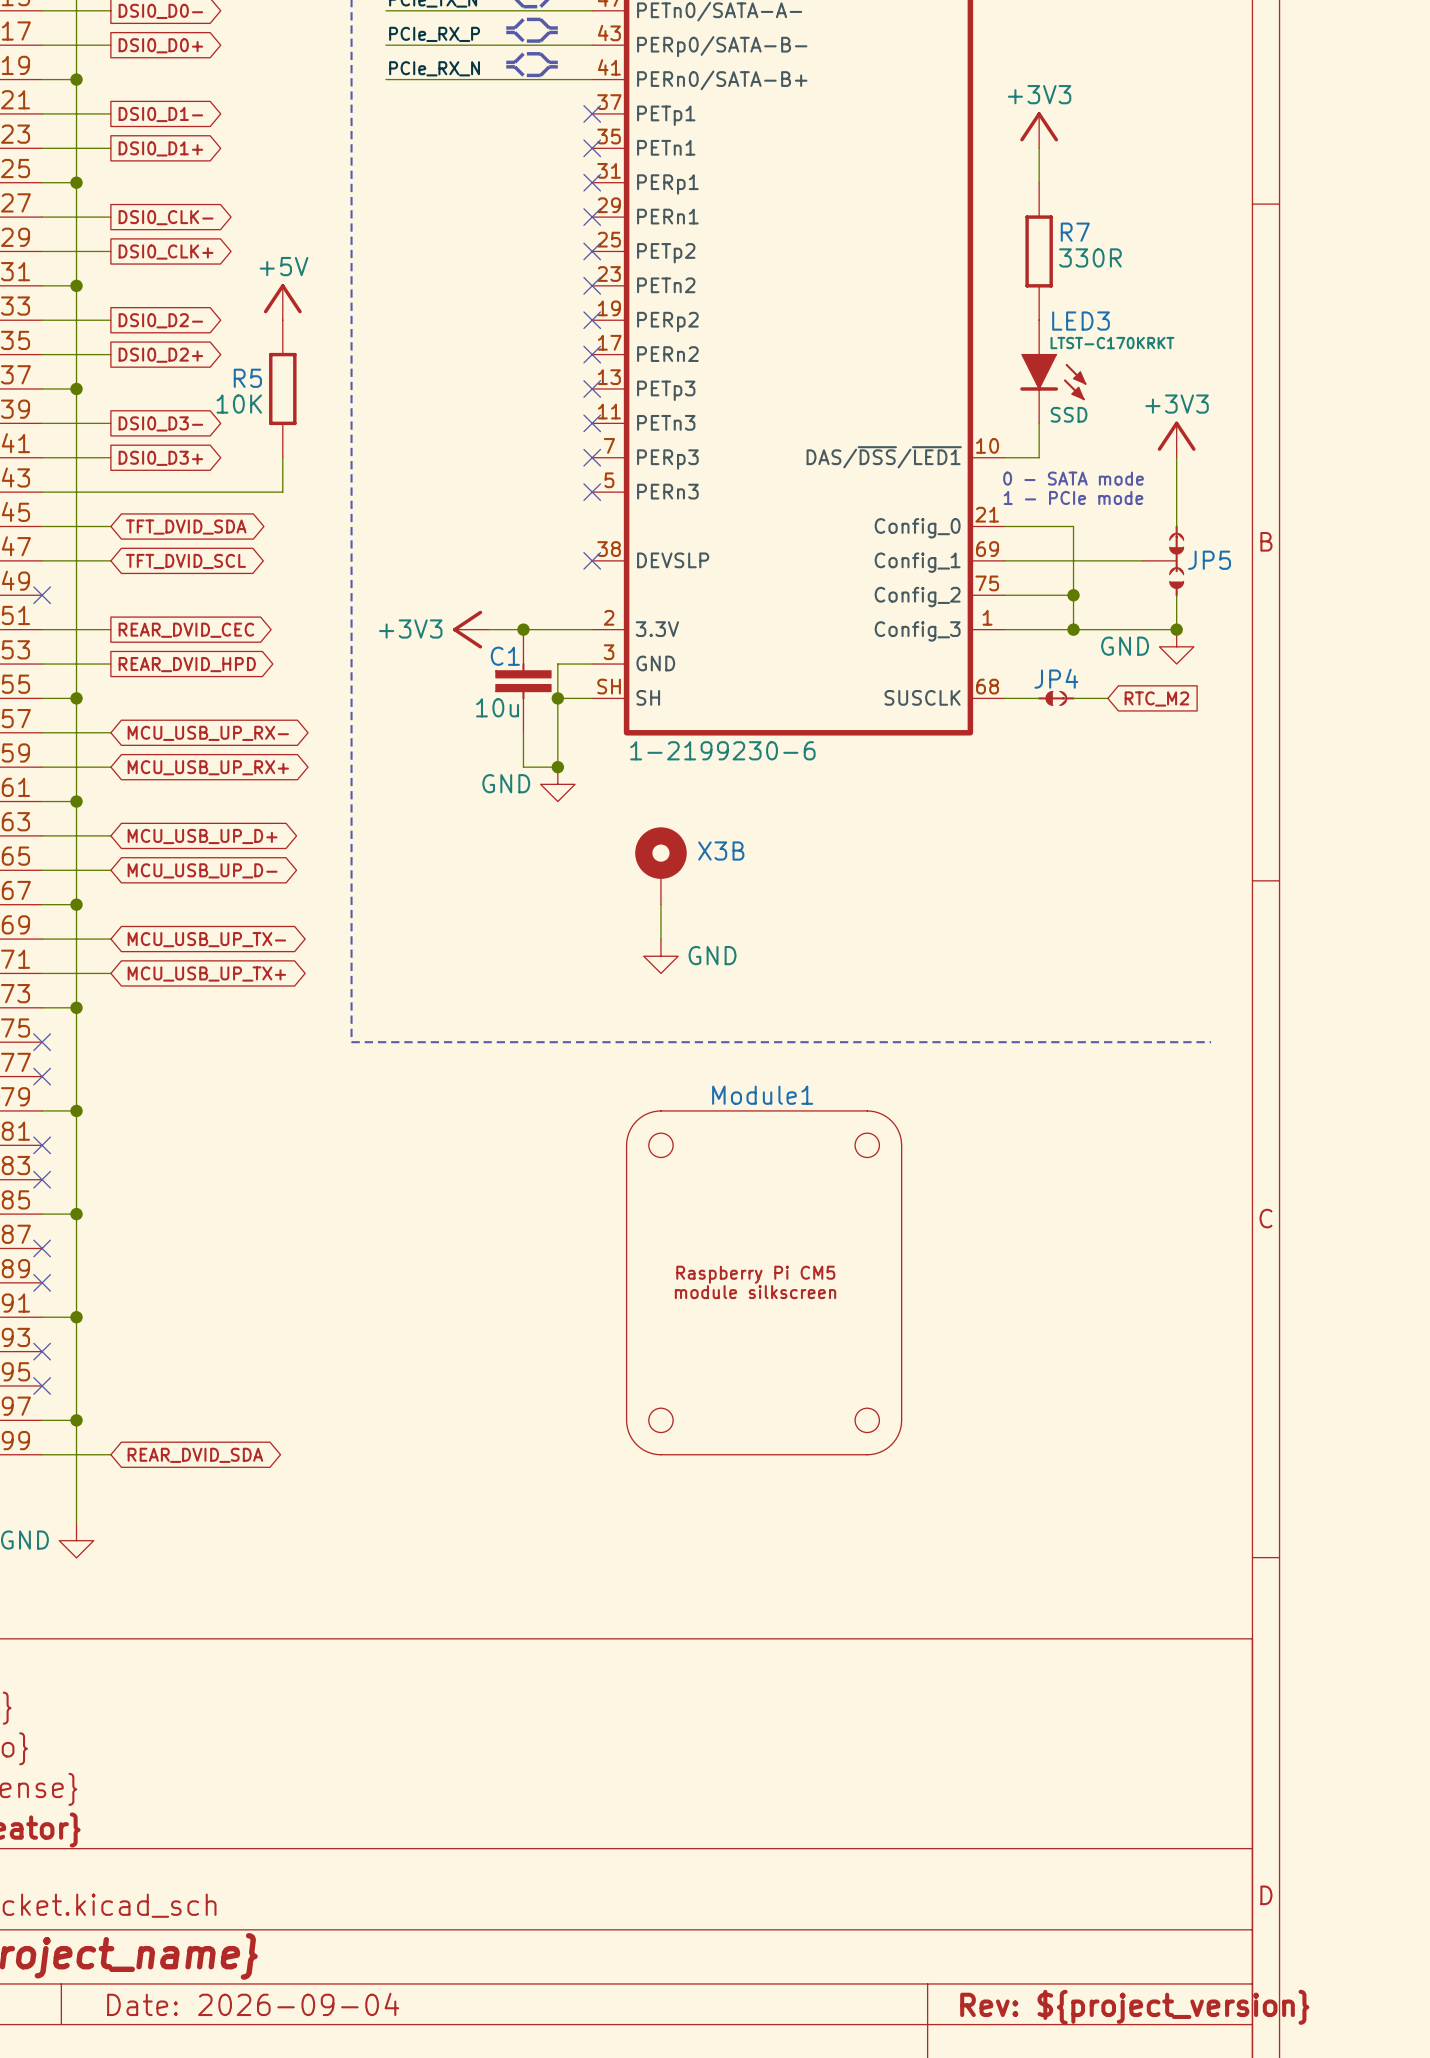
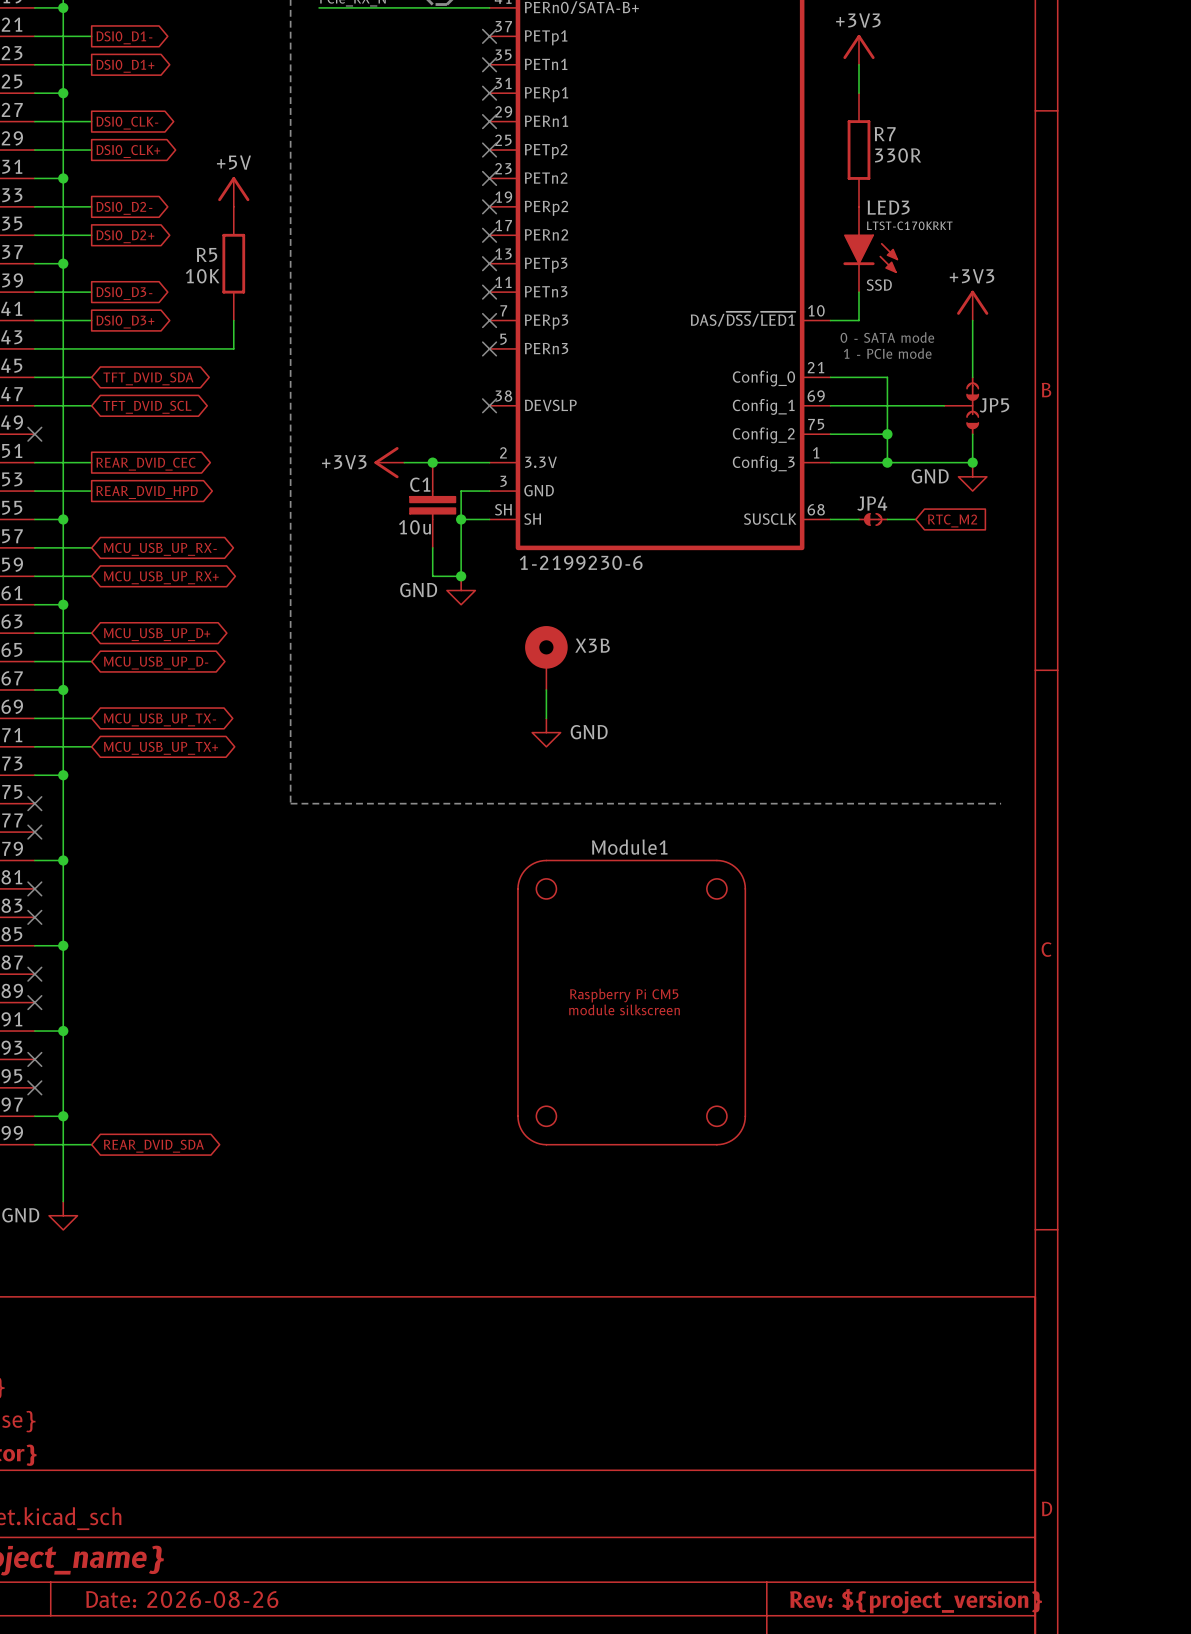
title block: Date: 2026-09-04 (253, 2004) -> Date: 2026-08-26 (182, 1599)

